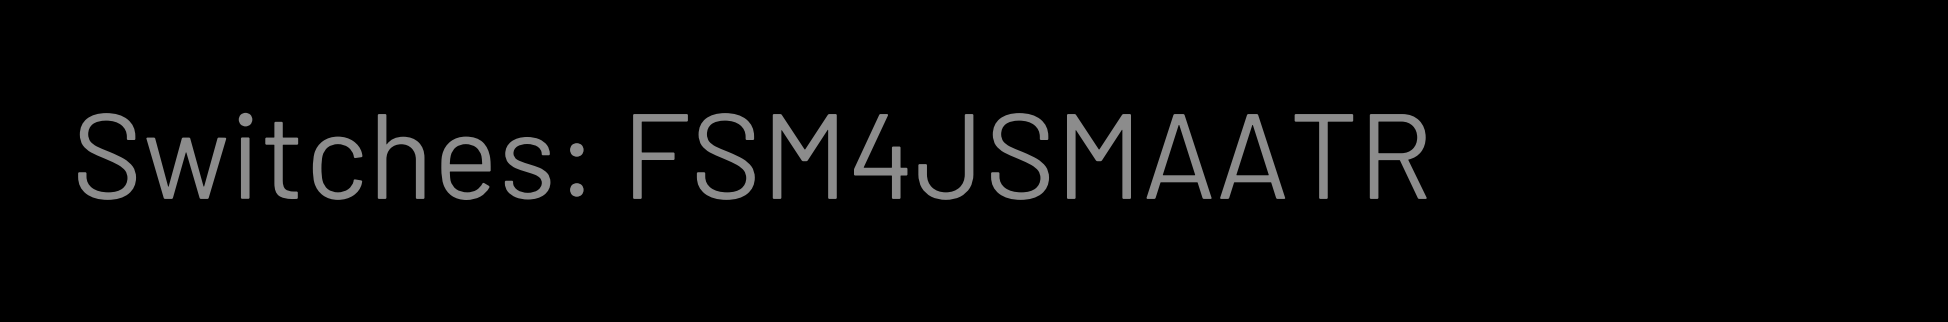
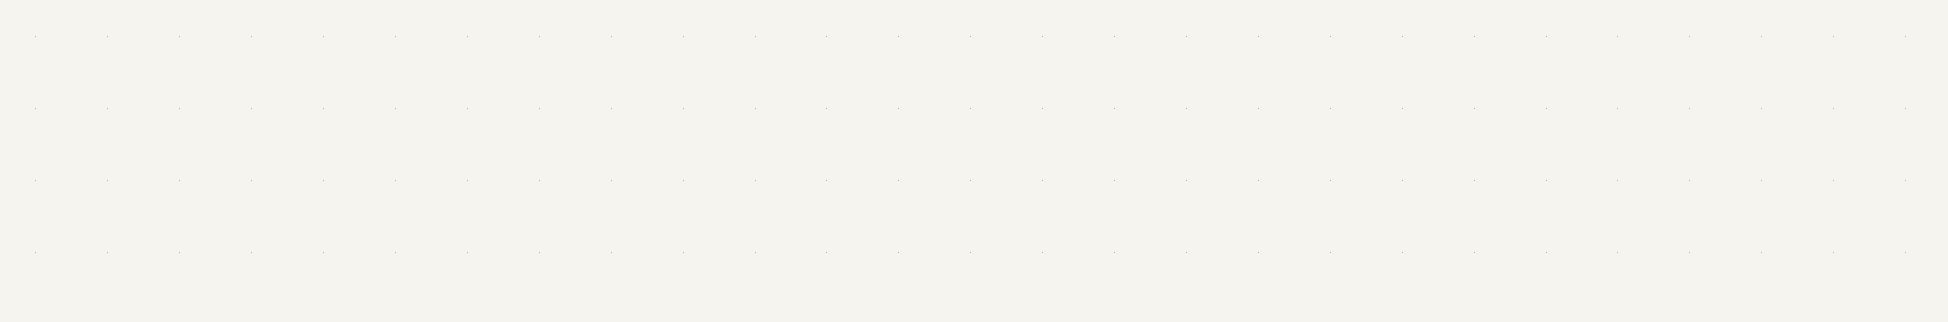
text: Switches: FSM4JSMAATR (752, 156) -> none

